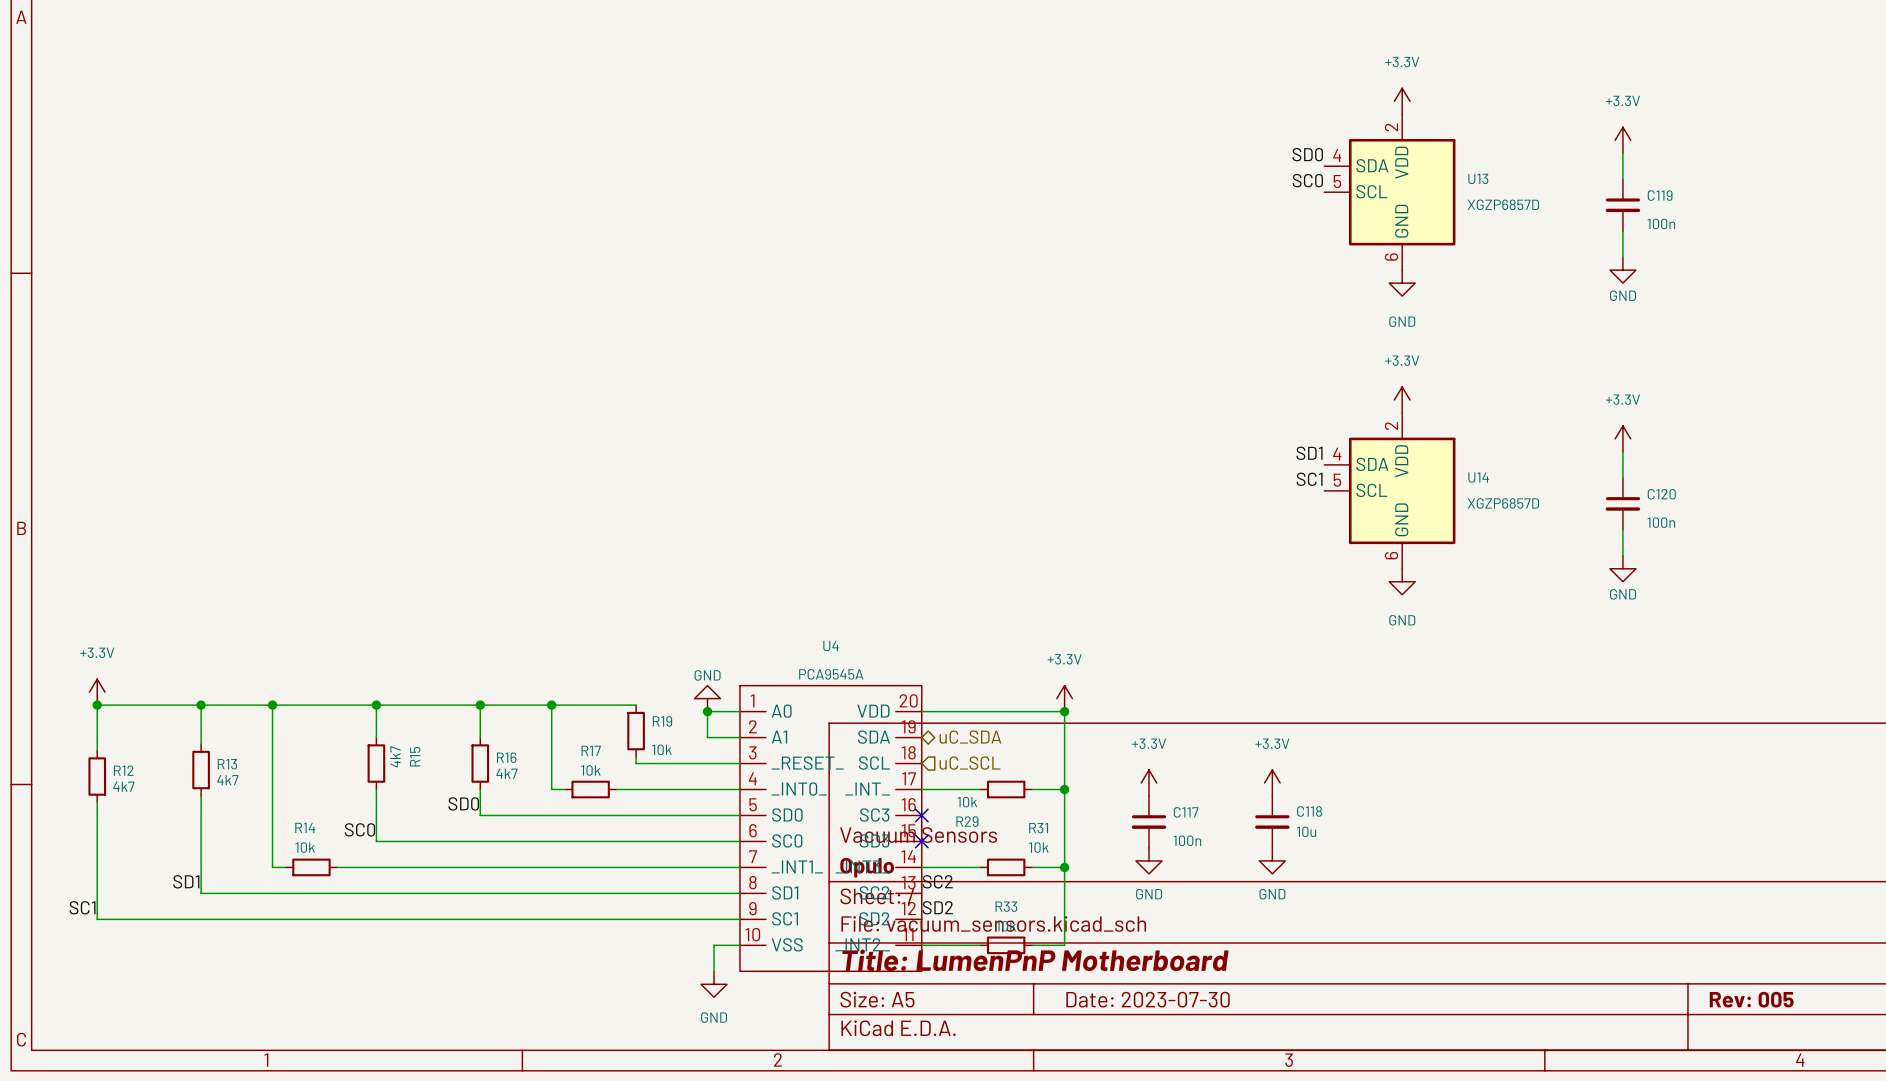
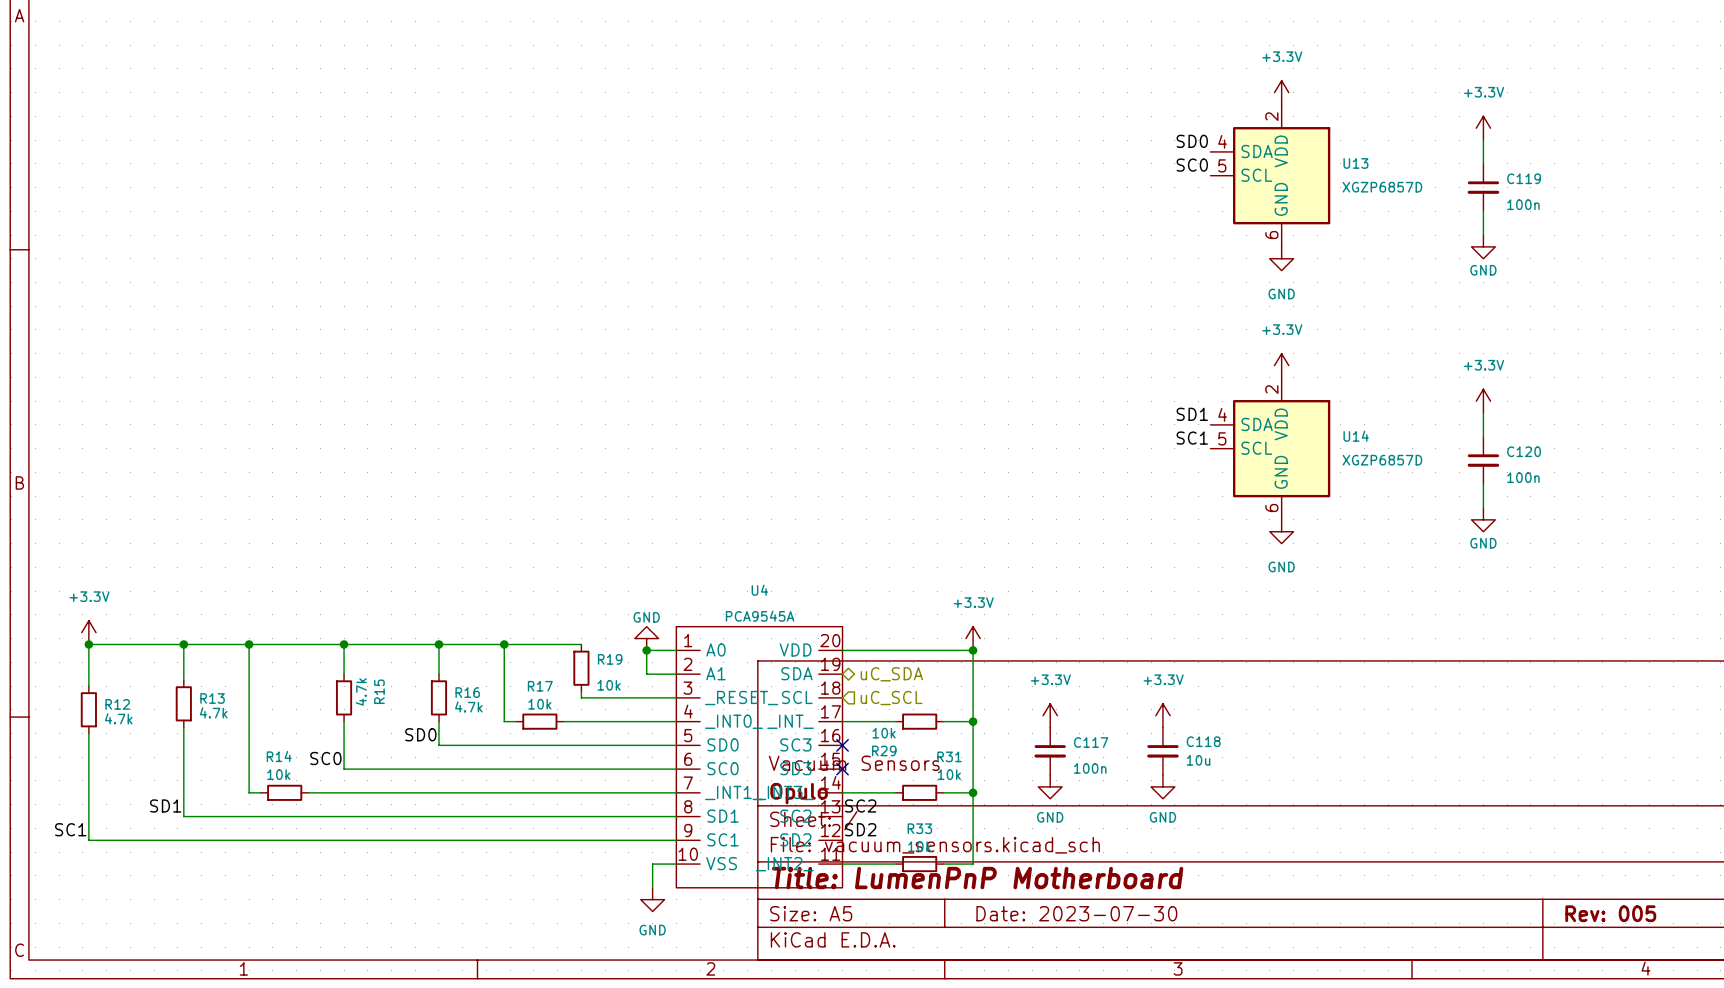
R15 value: 4k7 (395, 756) -> 4.7k (361, 691)
R16 value: 4k7 (506, 773) -> 4.7k (468, 706)
R13 value: 4k7 (227, 780) -> 4.7k (213, 712)
R12 value: 4k7 (123, 786) -> 4.7k (118, 718)

